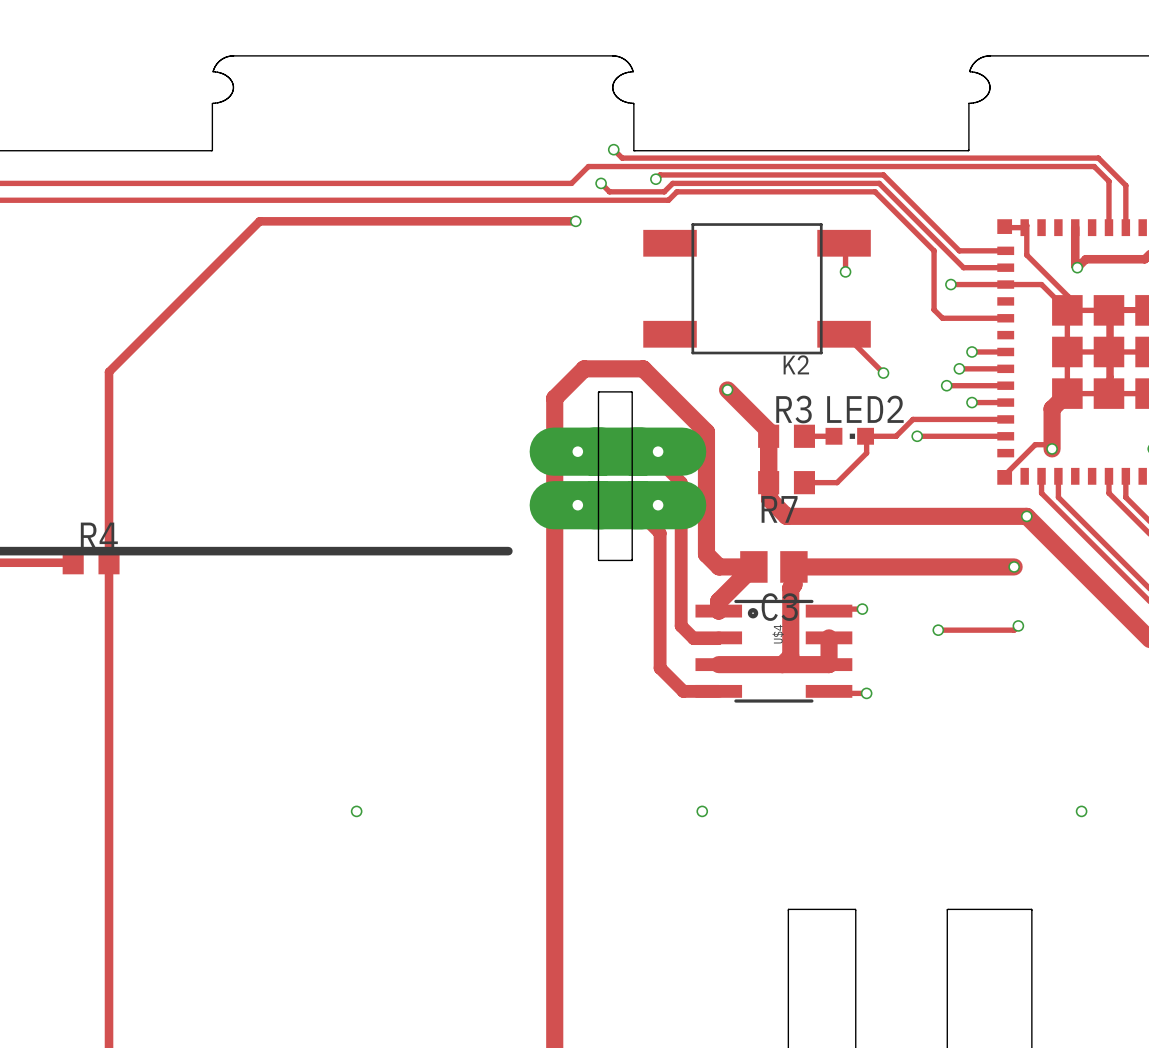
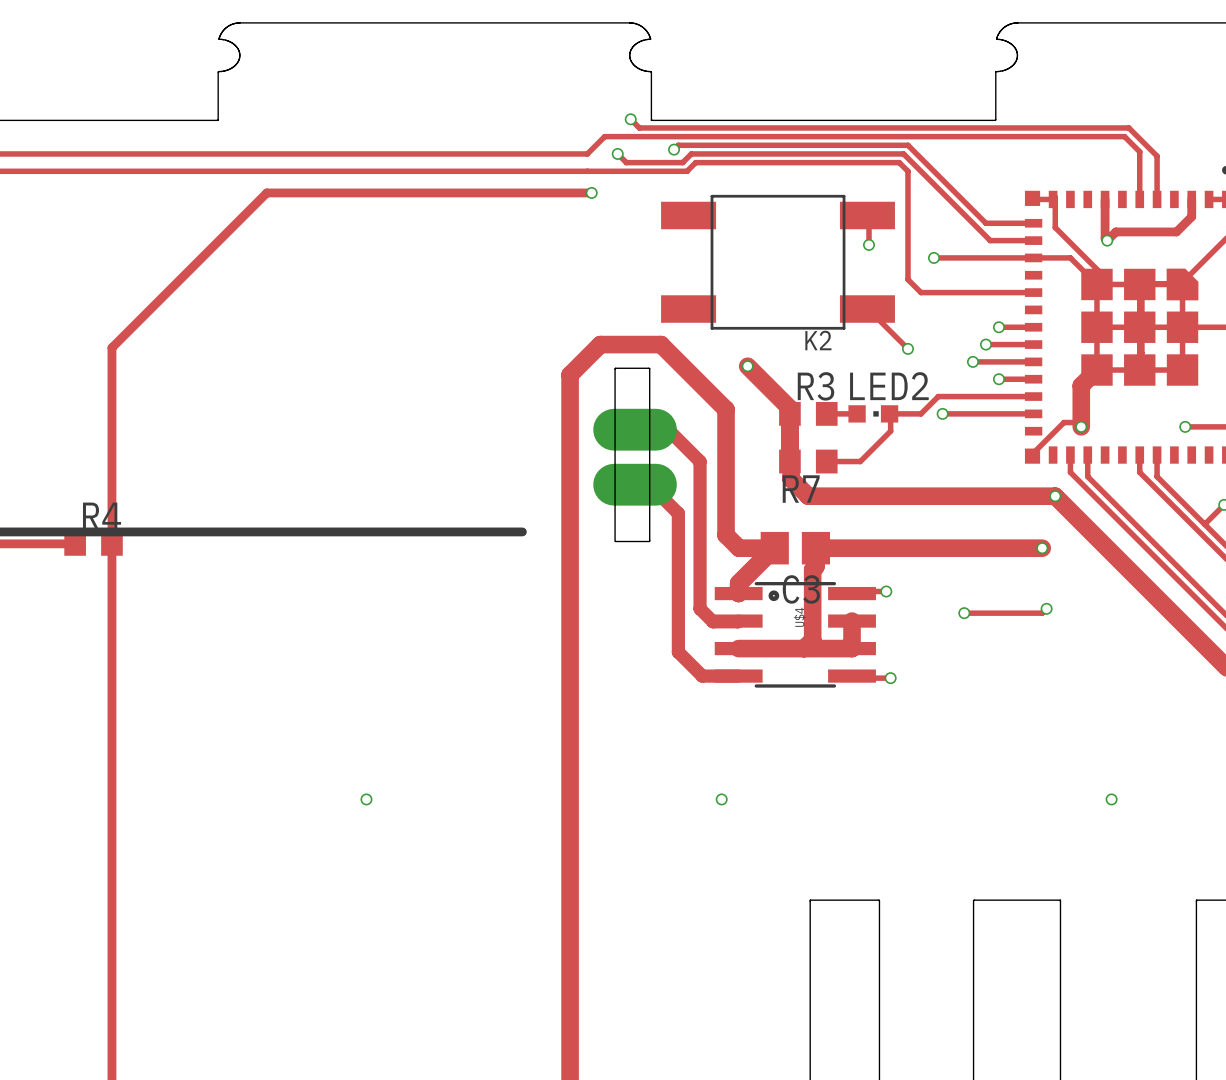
track: (883, 200) (934, 250) (934, 309) (942, 318) -> (907, 171) (907, 279) (920, 292) (968, 292)
track: none -> (933, 257) (977, 257)
via position: (950, 284) -> (933, 257)
part footprint: [529, 427, 707, 530] -> [593, 408, 677, 506]

